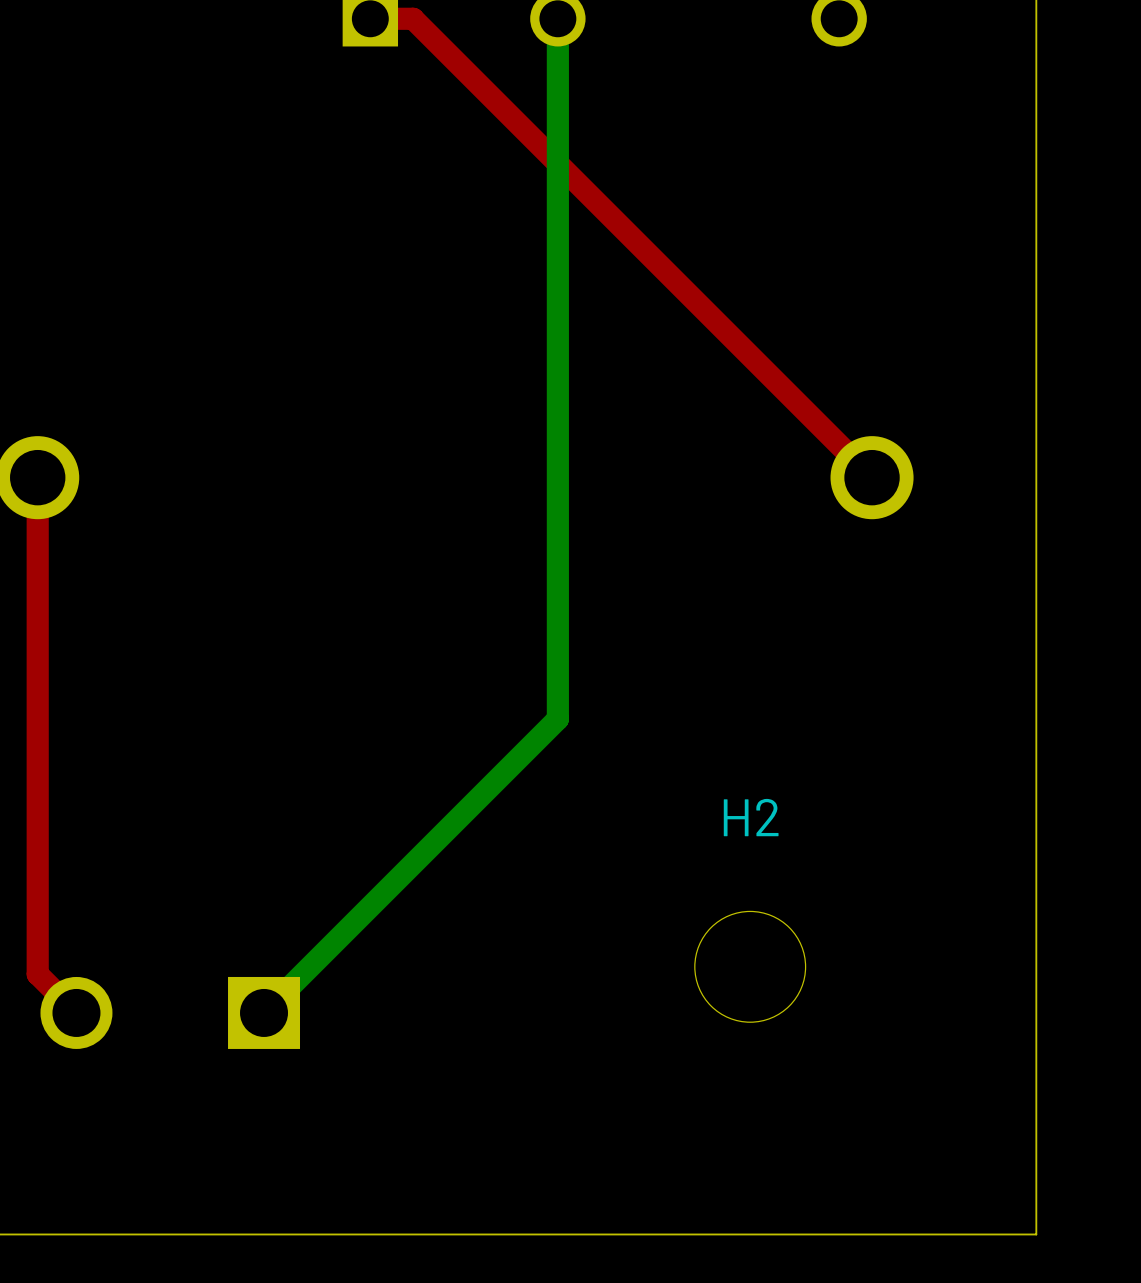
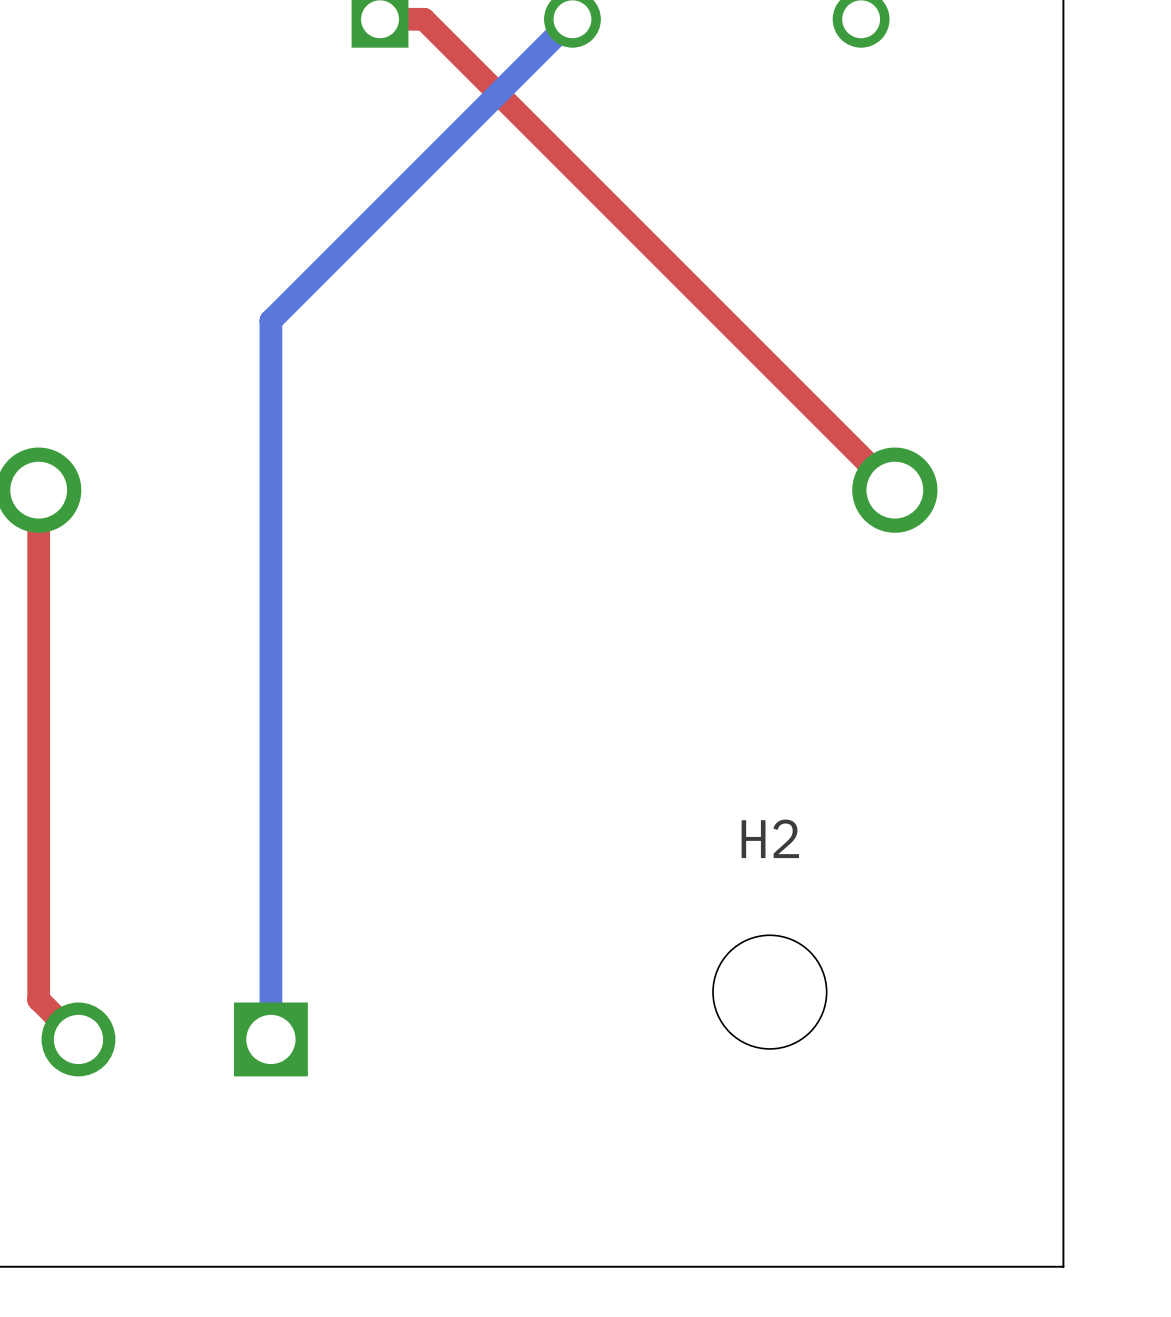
bottom track: (557, 18) (557, 719) (264, 1012) -> (572, 19) (270, 320) (270, 1039)

